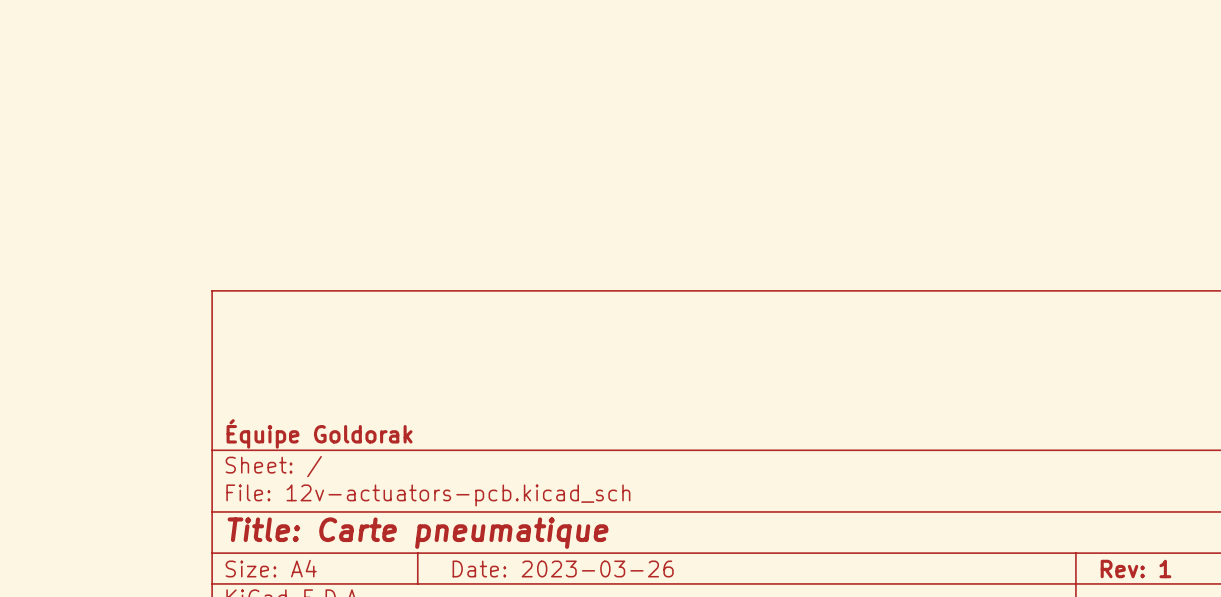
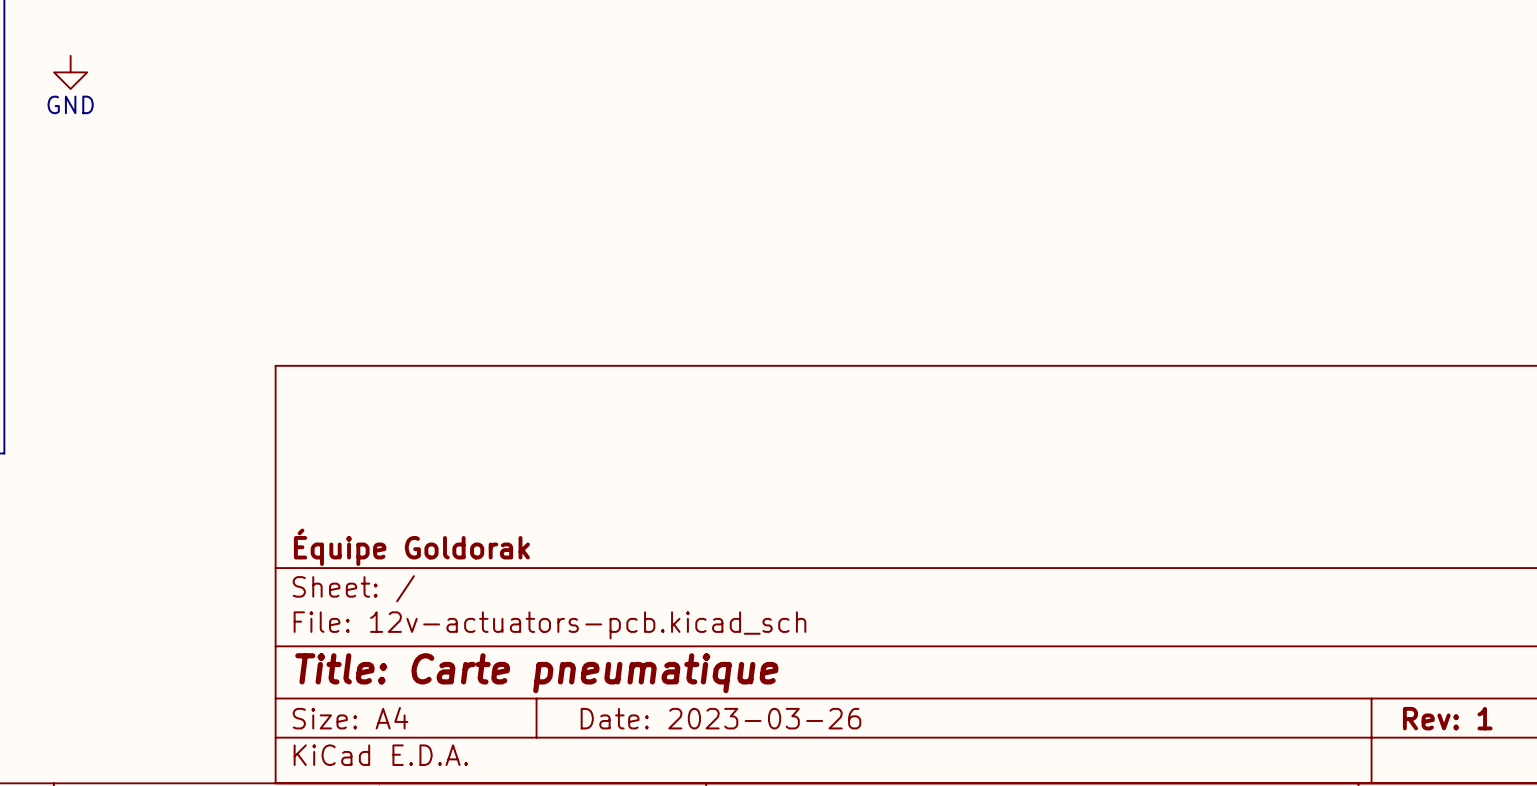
power symbol: none -> GND (70, 72)

